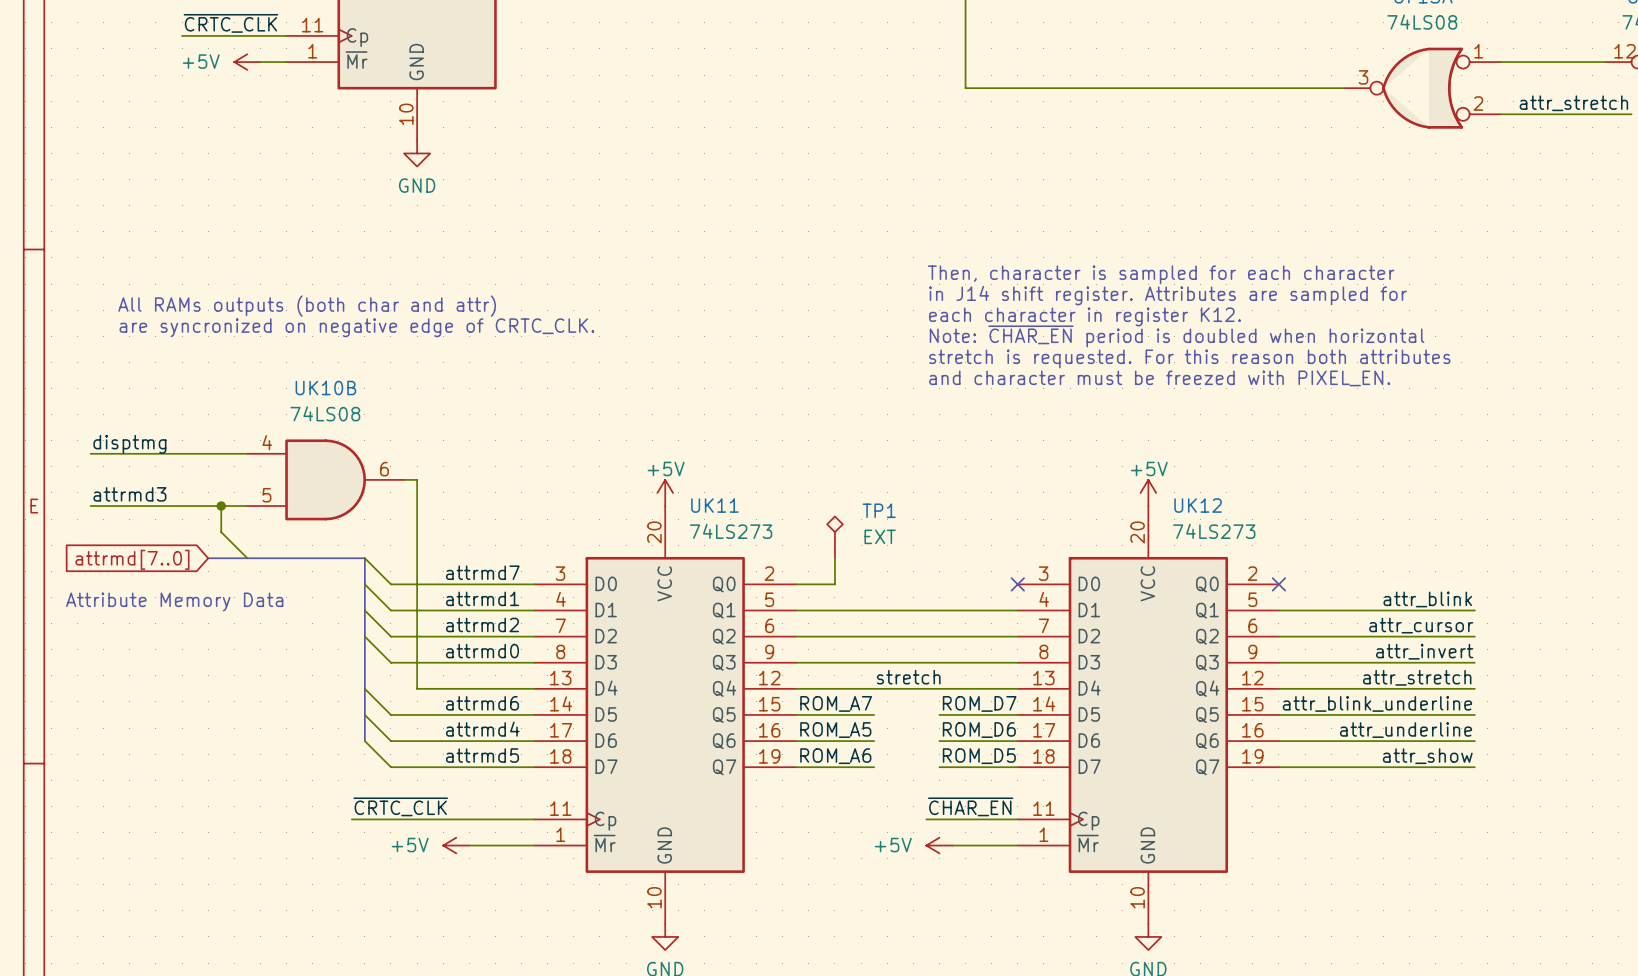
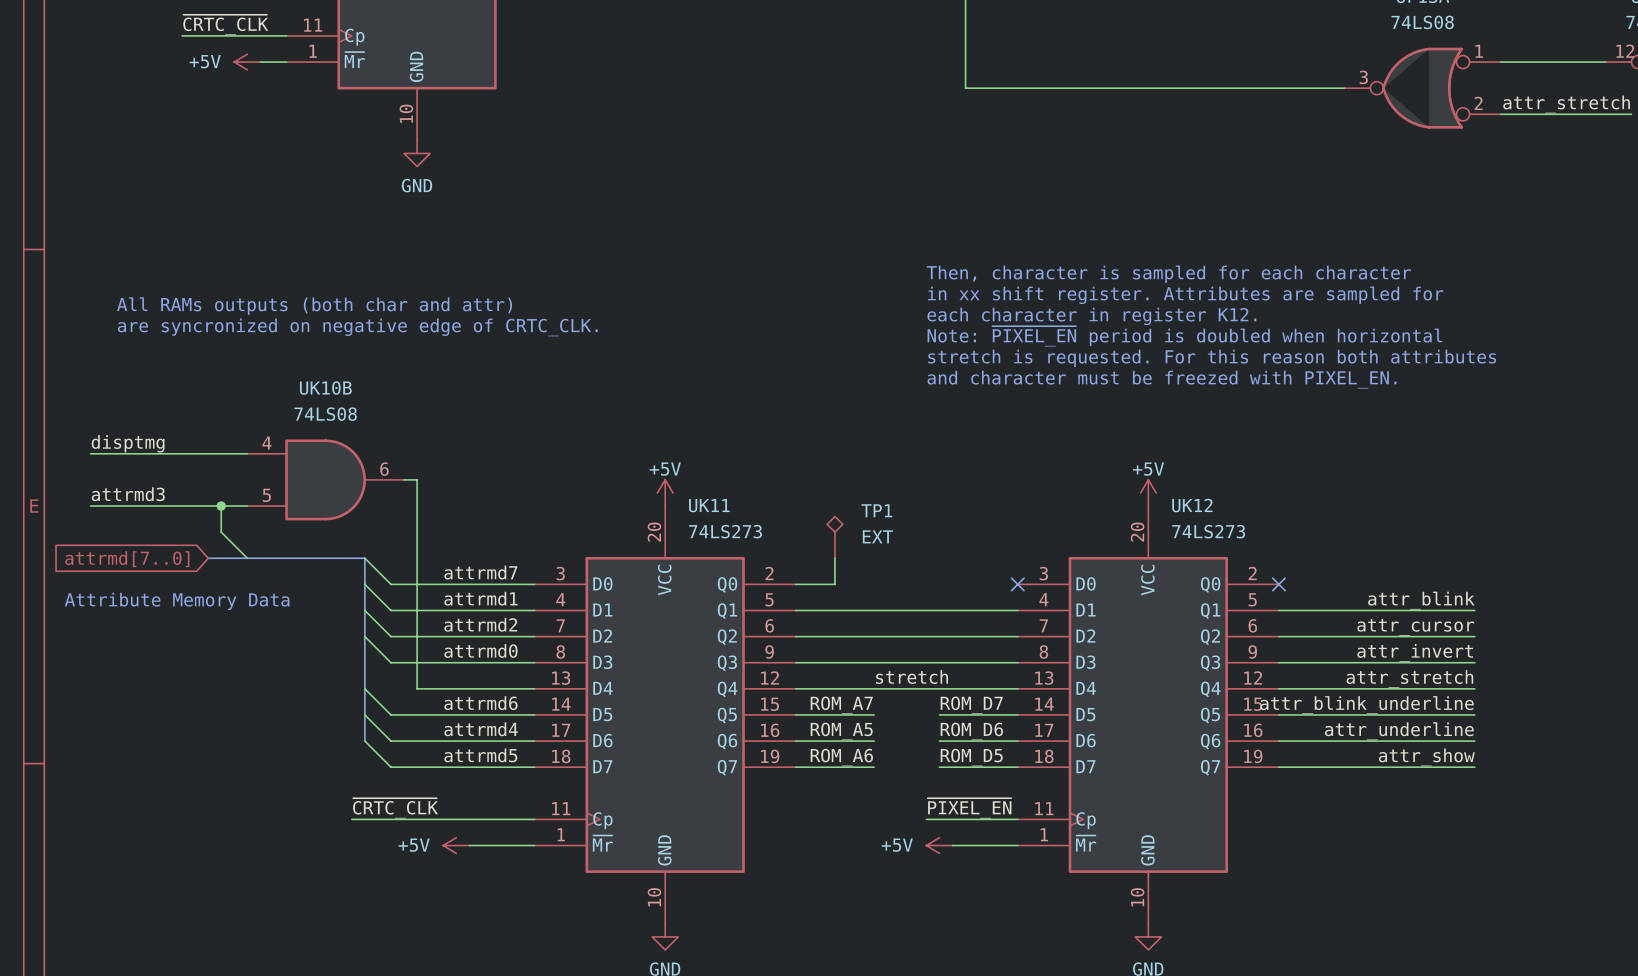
text: in J14 shift register. Attributes are sampled for (1168, 295) -> in xx shift register. Attributes are sampled for (1185, 295)
text: Note: ~{CHAR_EN} period is doubled when horizontal (1177, 336) -> Note: ~{PIXEL_EN} period is doubled when horizontal (1184, 336)
label: ~{CHAR_EN} (970, 806) -> ~{PIXEL_EN} (969, 808)

